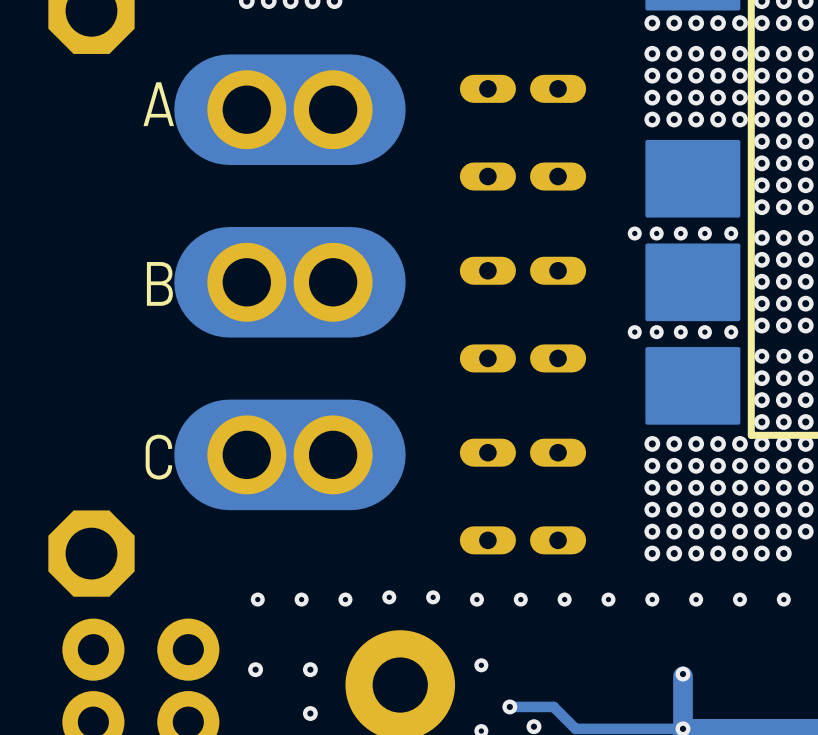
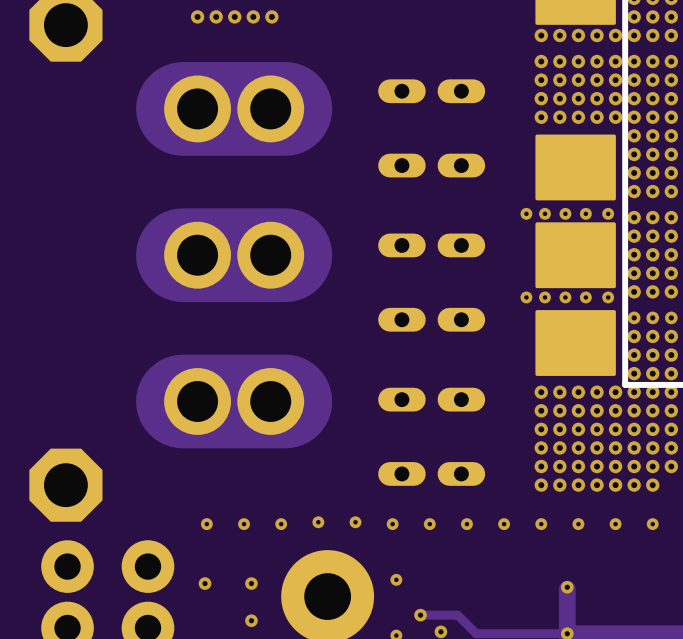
text: A (158, 104) -> none
text: B (159, 283) -> none
text: C (158, 457) -> none

